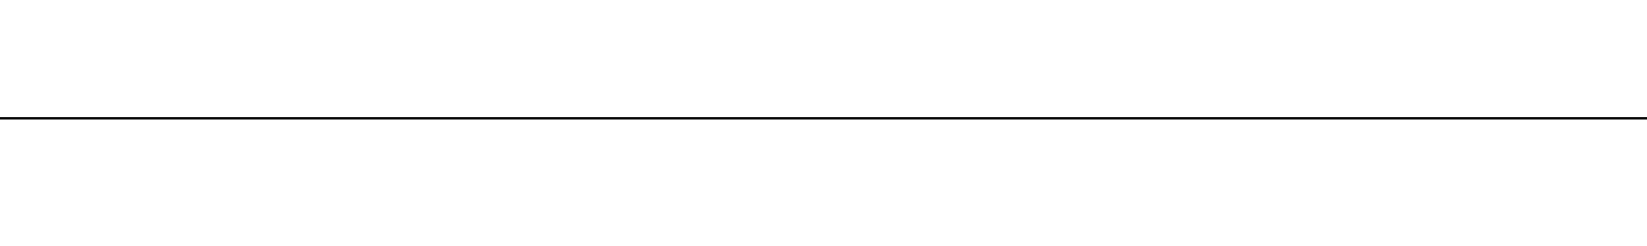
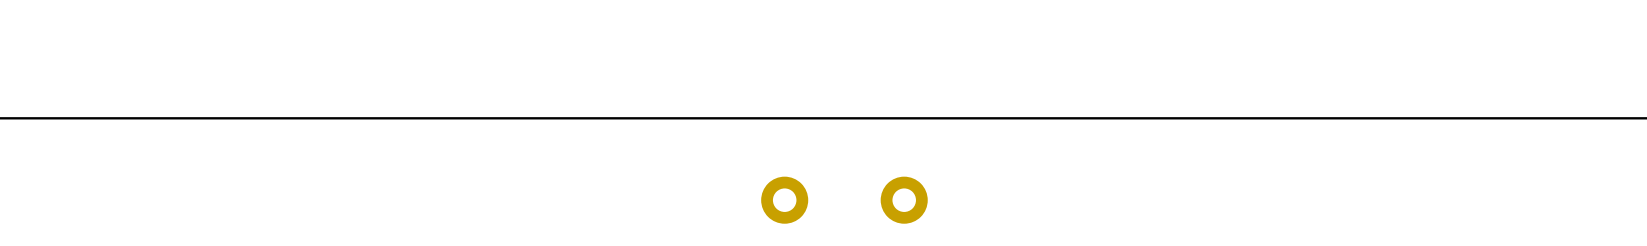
part: none -> (784, 200)
part: none -> (904, 200)

